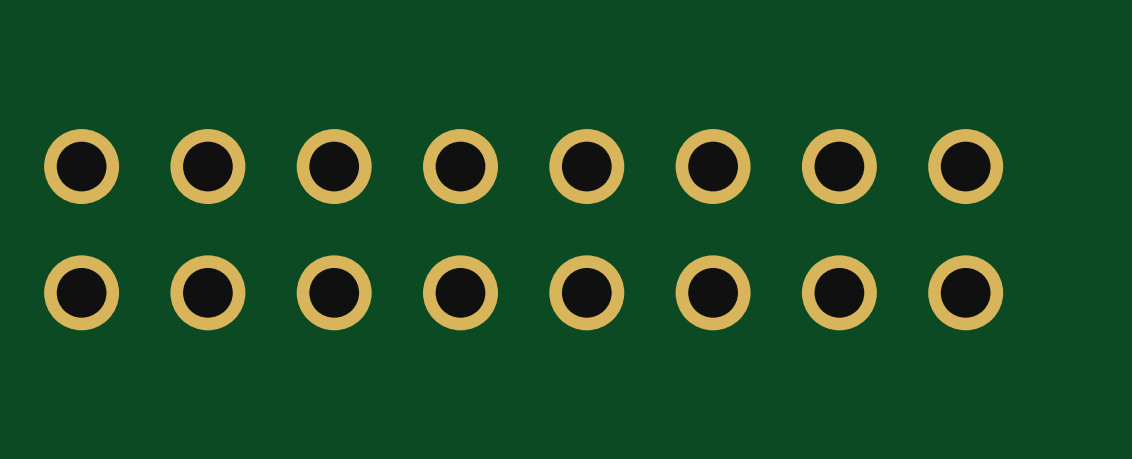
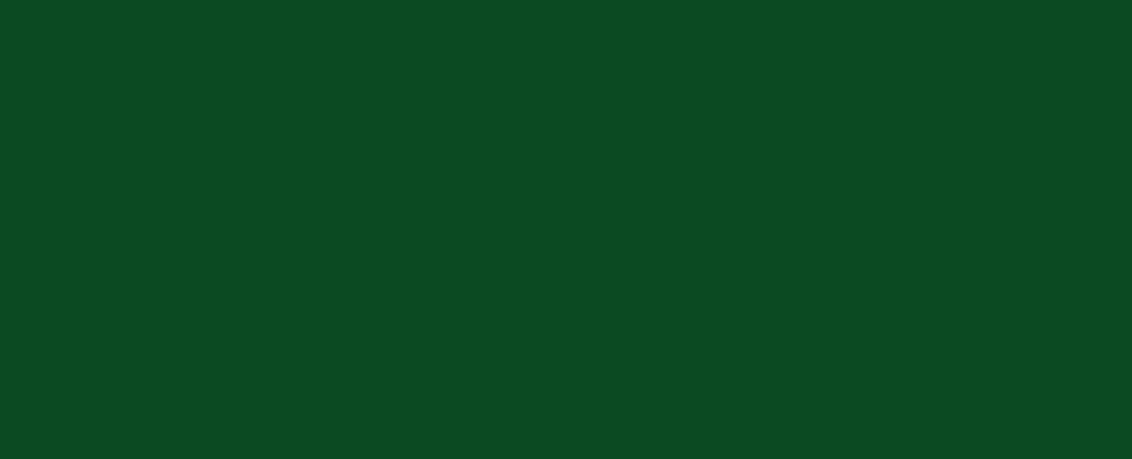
part: (523, 229) -> none

